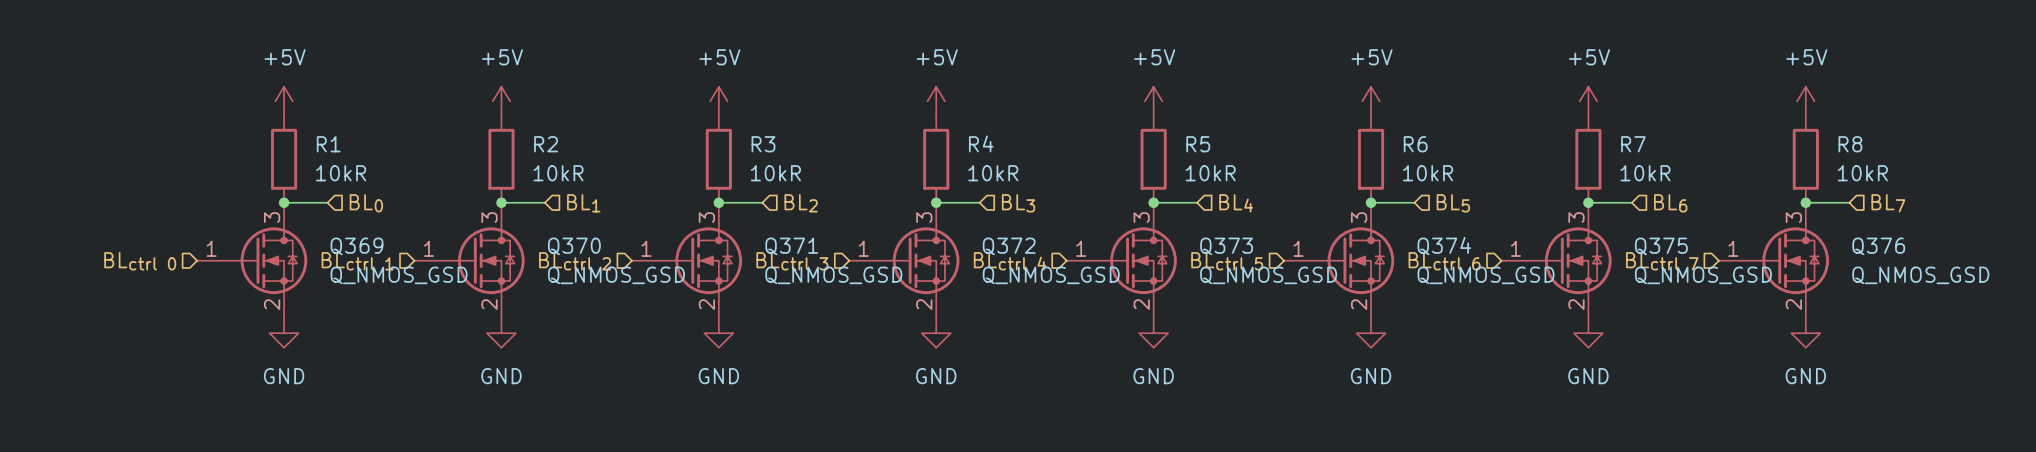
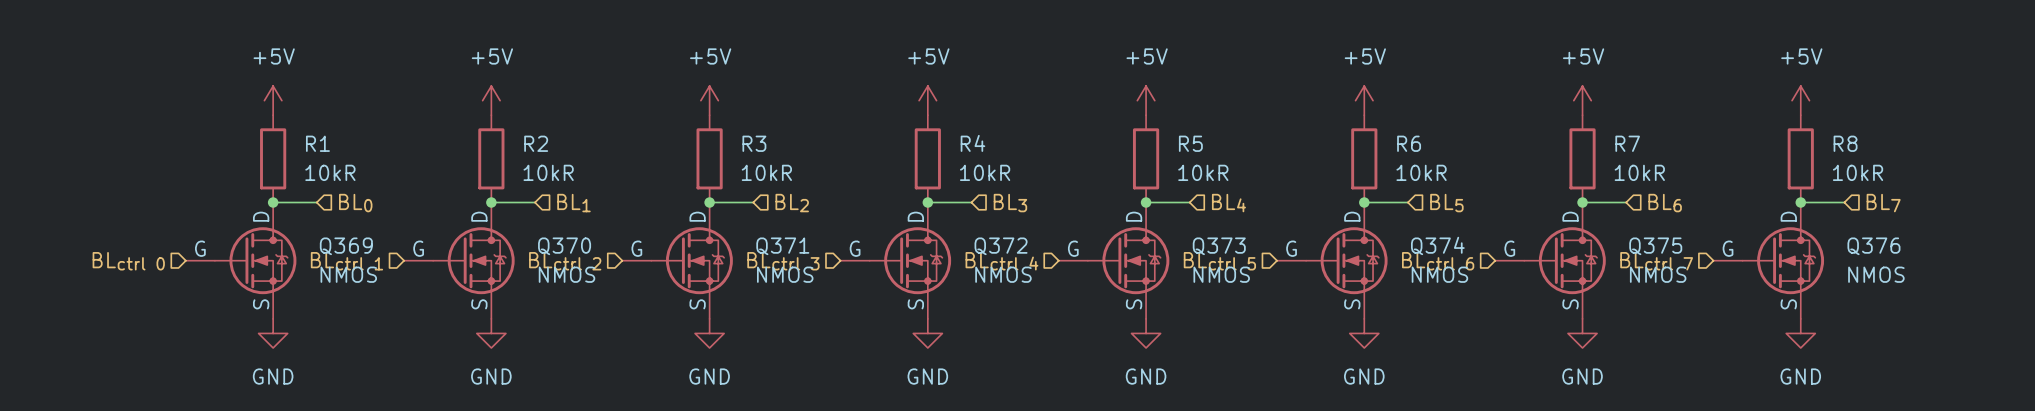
Q369 symbol: [197, 202, 308, 319] -> [185, 202, 297, 319]
Q370 symbol: [414, 202, 525, 319] -> [404, 202, 515, 319]
Q371 symbol: [631, 202, 743, 319] -> [622, 202, 733, 319]
Q372 symbol: [849, 202, 960, 319] -> [840, 202, 952, 319]
Q373 symbol: [1066, 202, 1177, 319] -> [1058, 202, 1170, 319]
Q374 symbol: [1284, 202, 1395, 319] -> [1277, 202, 1388, 319]
Q375 symbol: [1501, 202, 1612, 319] -> [1495, 202, 1606, 319]
Q376 symbol: [1718, 202, 1830, 319] -> [1713, 202, 1825, 319]
Q369 value: Q_NMOS_GSD (399, 275) -> NMOS (348, 274)
Q370 value: Q_NMOS_GSD (616, 275) -> NMOS (566, 274)
Q371 value: Q_NMOS_GSD (833, 275) -> NMOS (785, 274)
Q372 value: Q_NMOS_GSD (1051, 275) -> NMOS (1003, 274)
Q373 value: Q_NMOS_GSD (1268, 275) -> NMOS (1221, 274)
Q374 value: Q_NMOS_GSD (1486, 275) -> NMOS (1439, 274)
Q375 value: Q_NMOS_GSD (1703, 275) -> NMOS (1658, 274)
Q376 value: Q_NMOS_GSD (1920, 275) -> NMOS (1876, 274)

